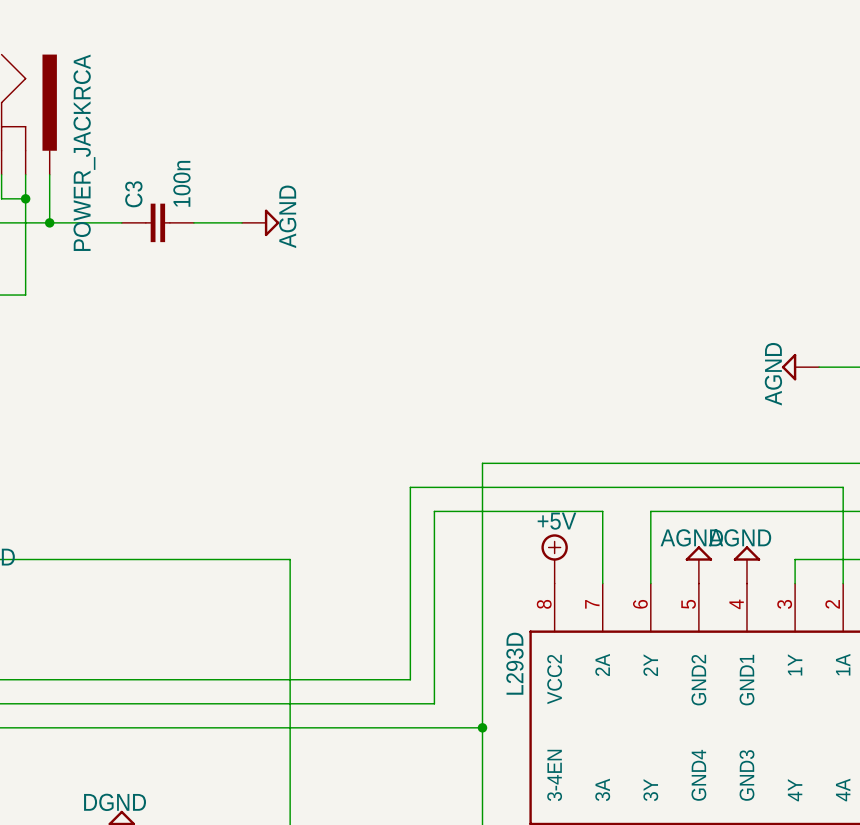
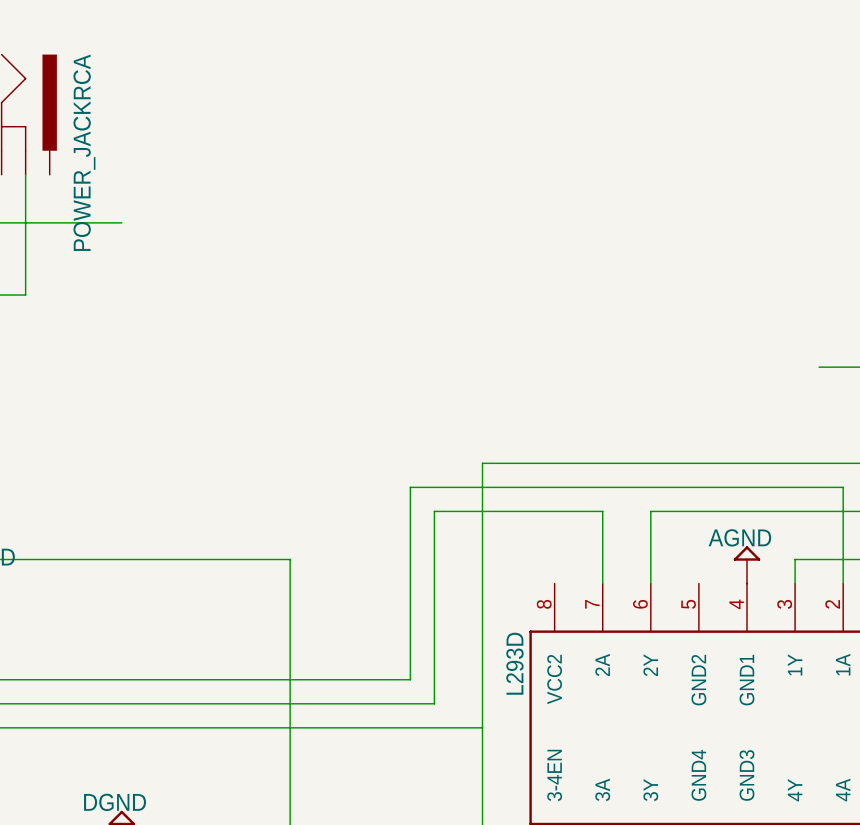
wire: (1, 174) (1, 198) (25, 198) -> none
wire: (49, 174) (49, 222) -> none
junction: (25, 198) -> none
junction: (49, 222) -> none
C3: 100n (157, 222) -> none
wire: (193, 222) (242, 222) -> none
power symbol: AGND (260, 222) -> none
power symbol: AGND (800, 367) -> none
power symbol: +5V (554, 558) -> none
power symbol: AGND (698, 564) -> none
junction: (482, 727) -> none

